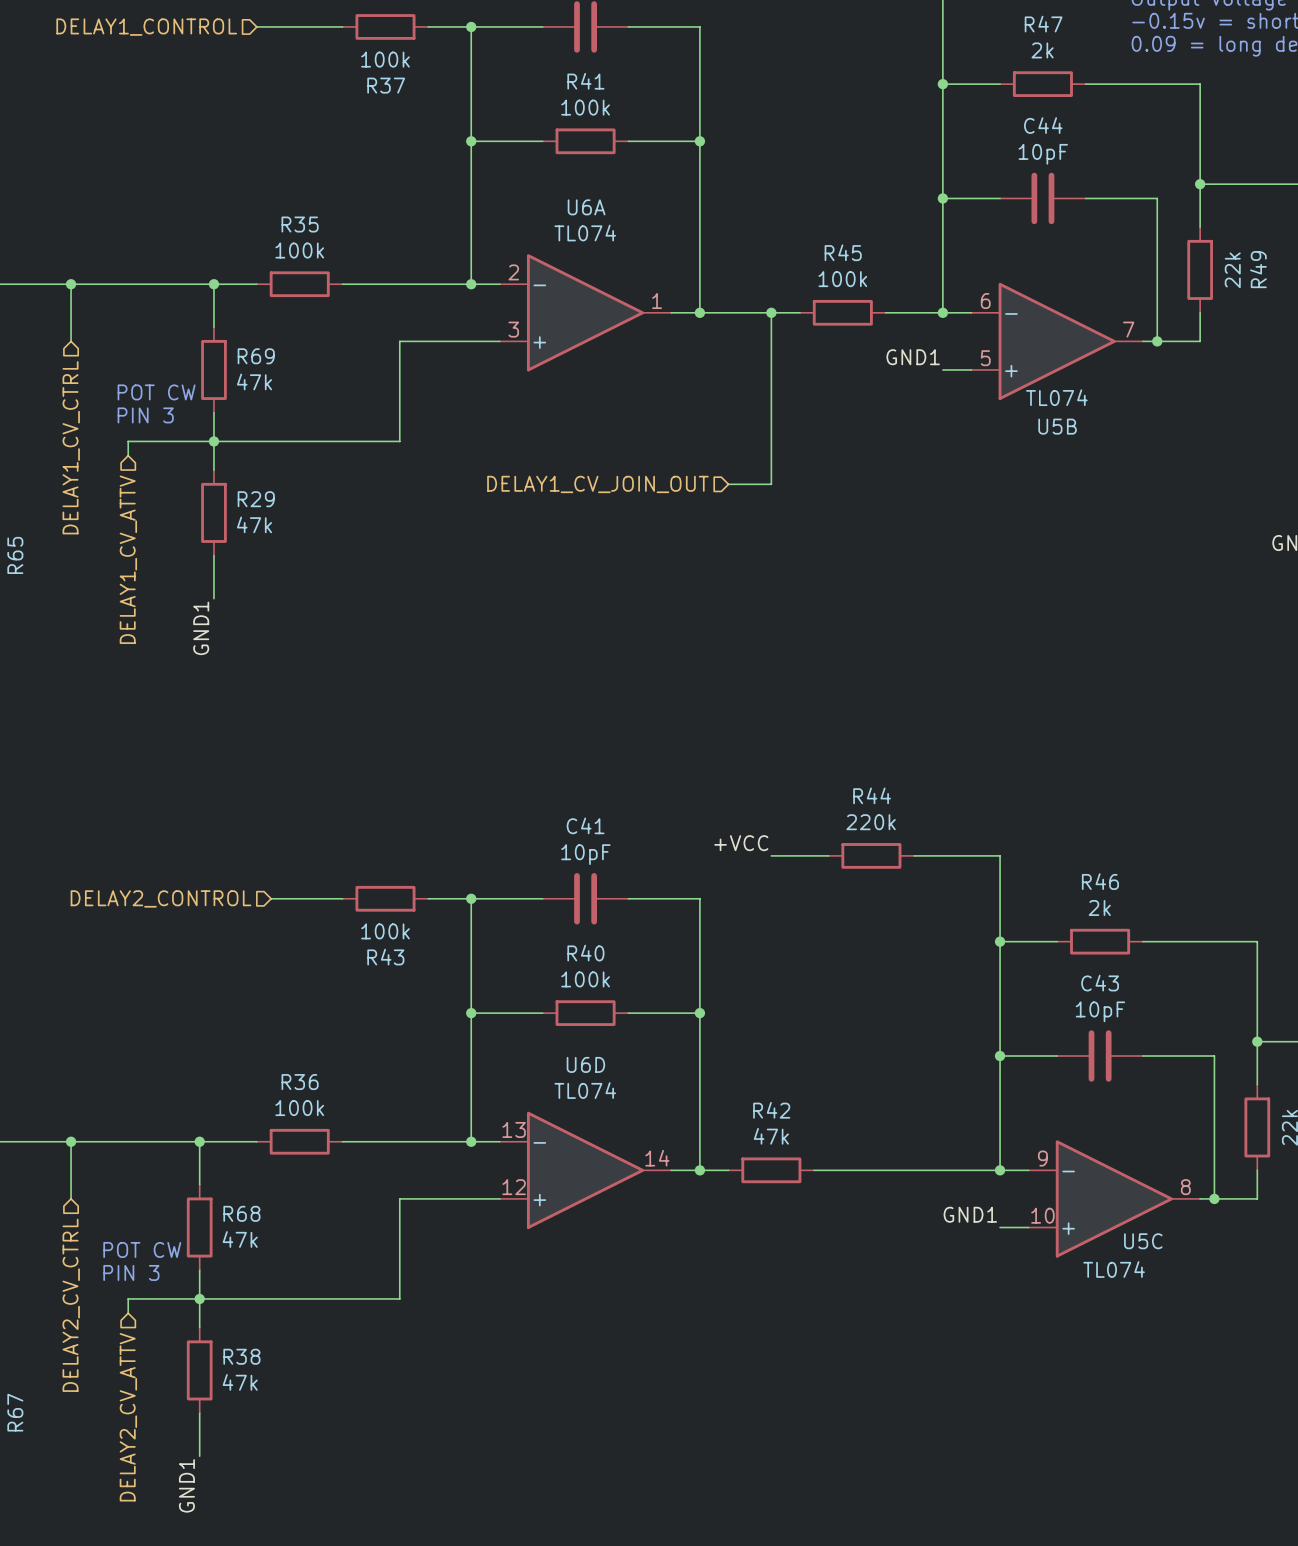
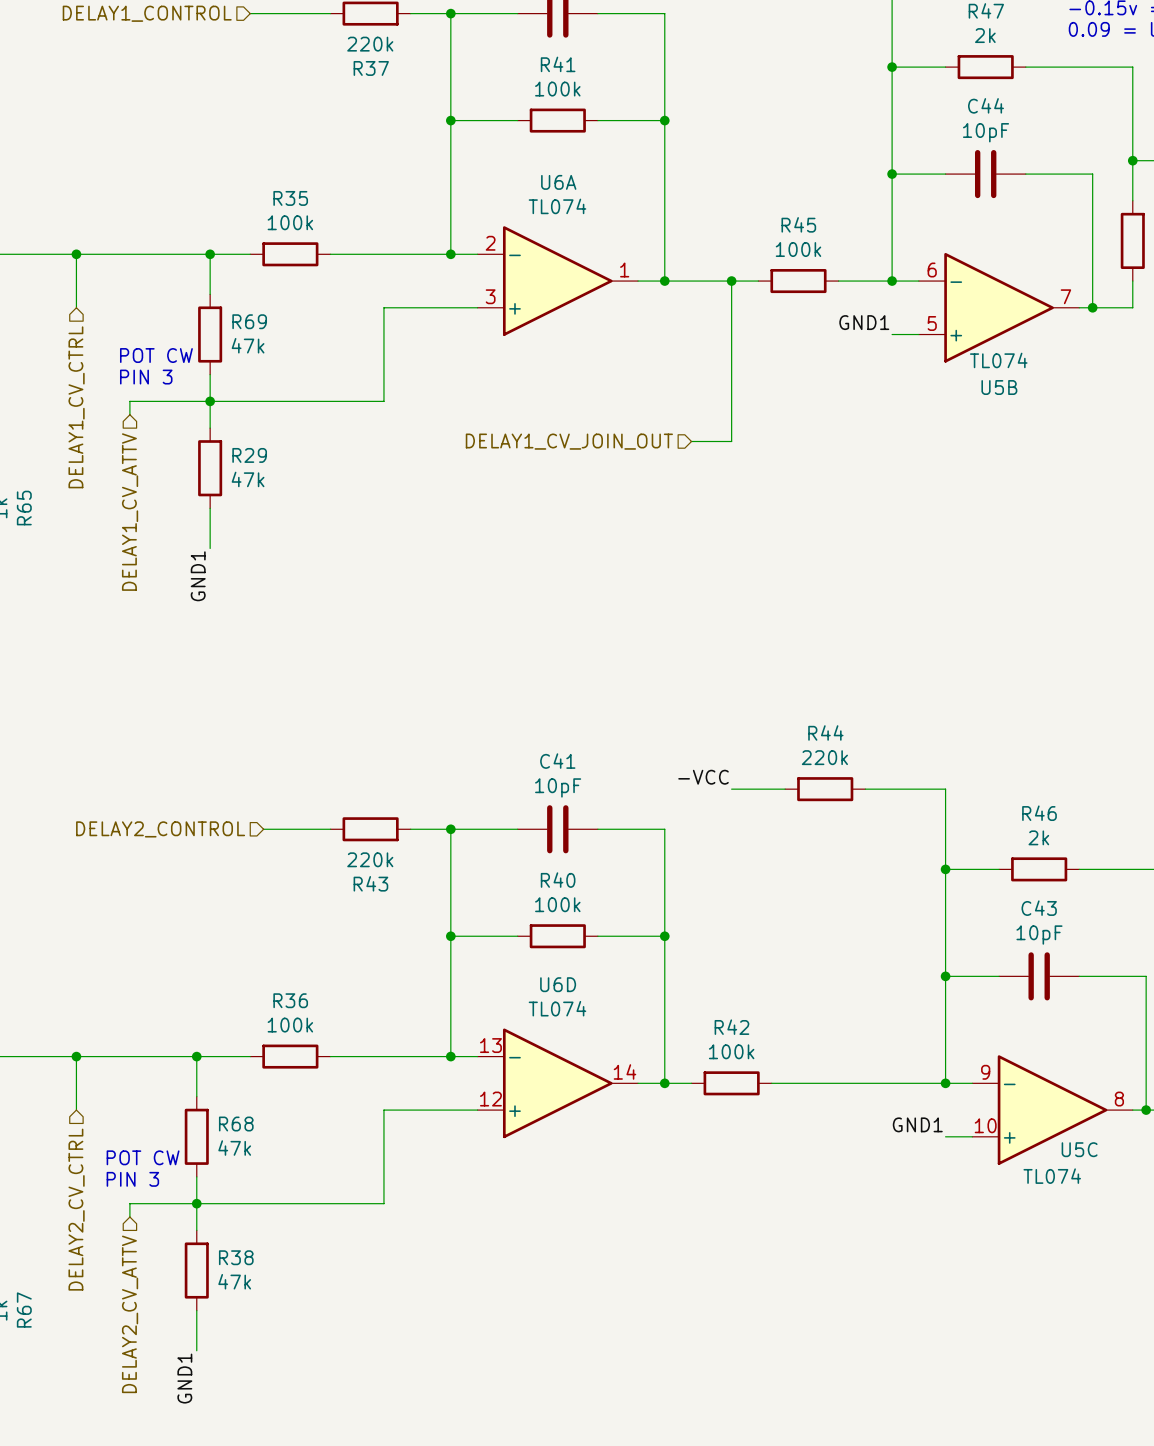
R37 value: 100k (385, 59) -> 220k (370, 44)
label: +VCC (741, 843) -> -VCC (703, 777)
R43 value: 100k (385, 931) -> 220k (370, 859)
R42 value: 47k (771, 1136) -> 100k (731, 1051)

